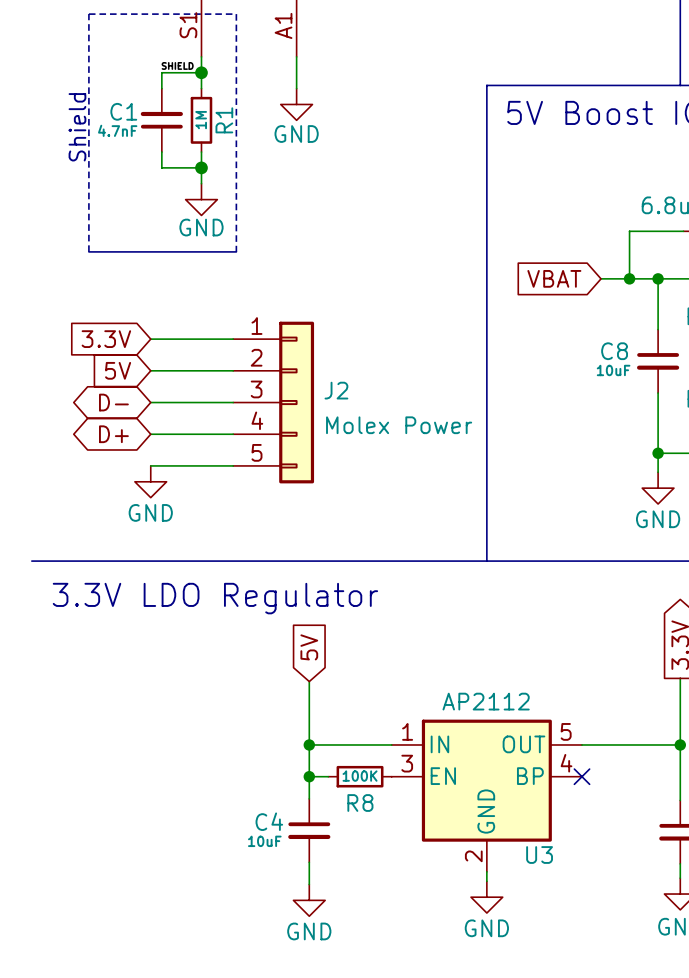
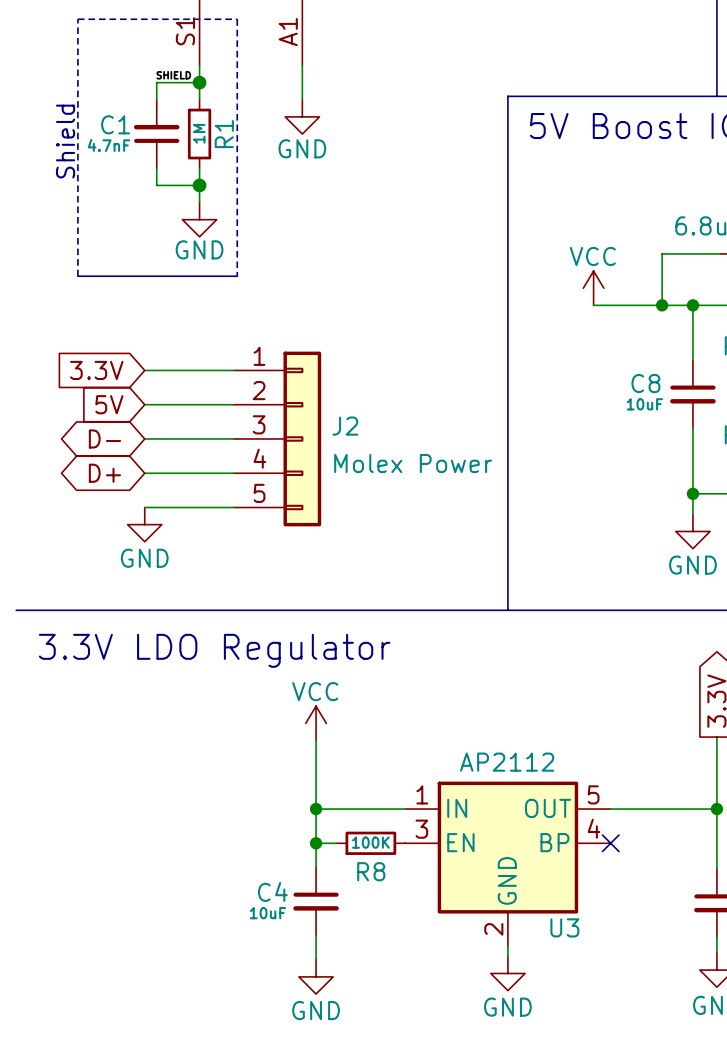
power symbol: none -> VCC (593, 288)
global label: VBAT (554, 278) -> none
wire: none -> (593, 305) (631, 305)
global label: 5V (309, 647) -> none
power symbol: none -> VCC (316, 723)

